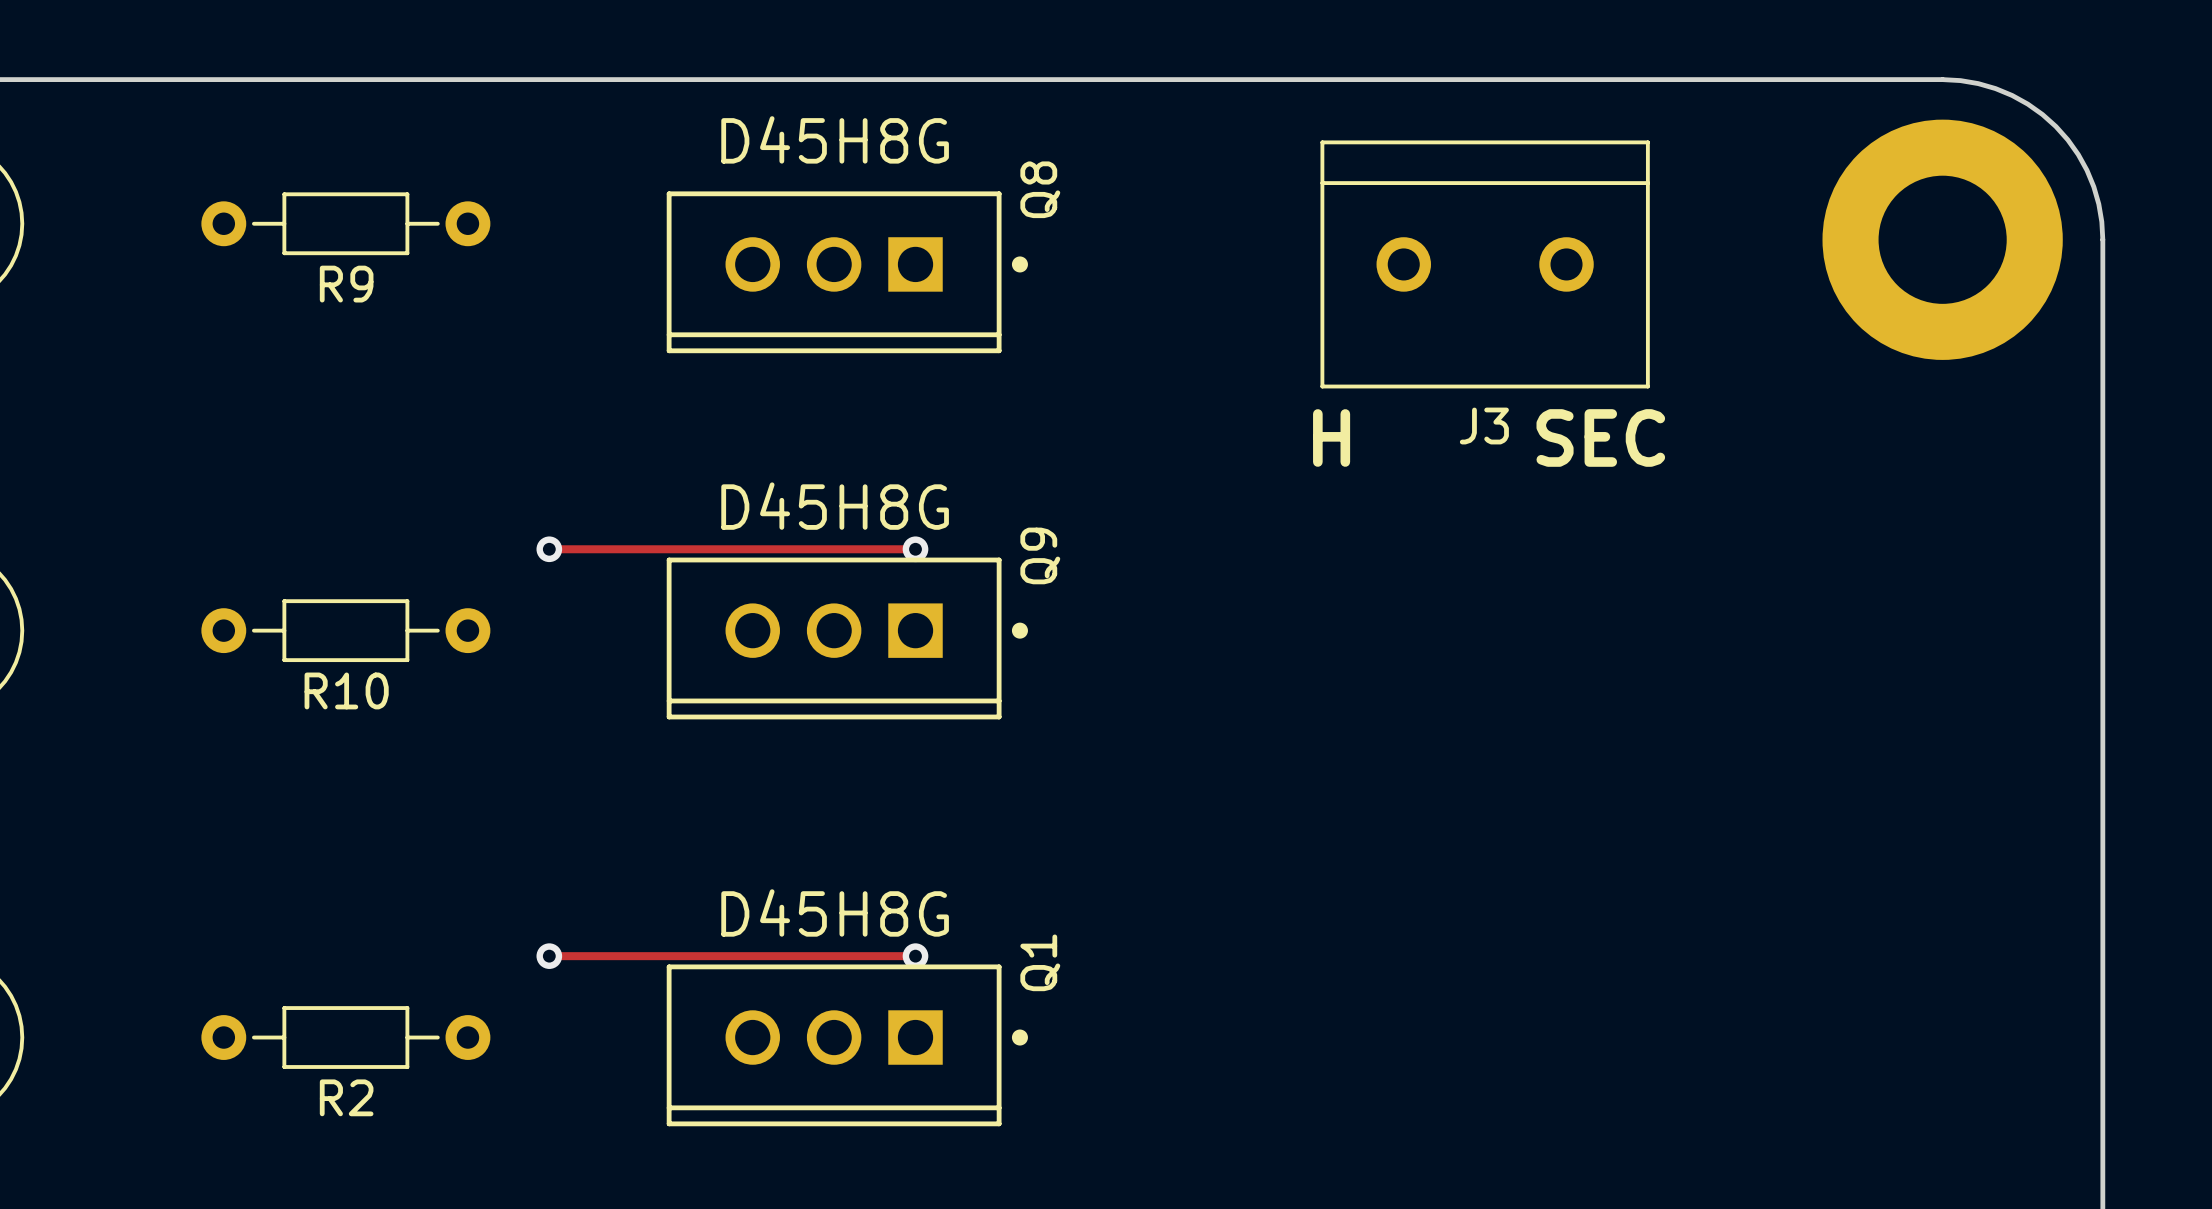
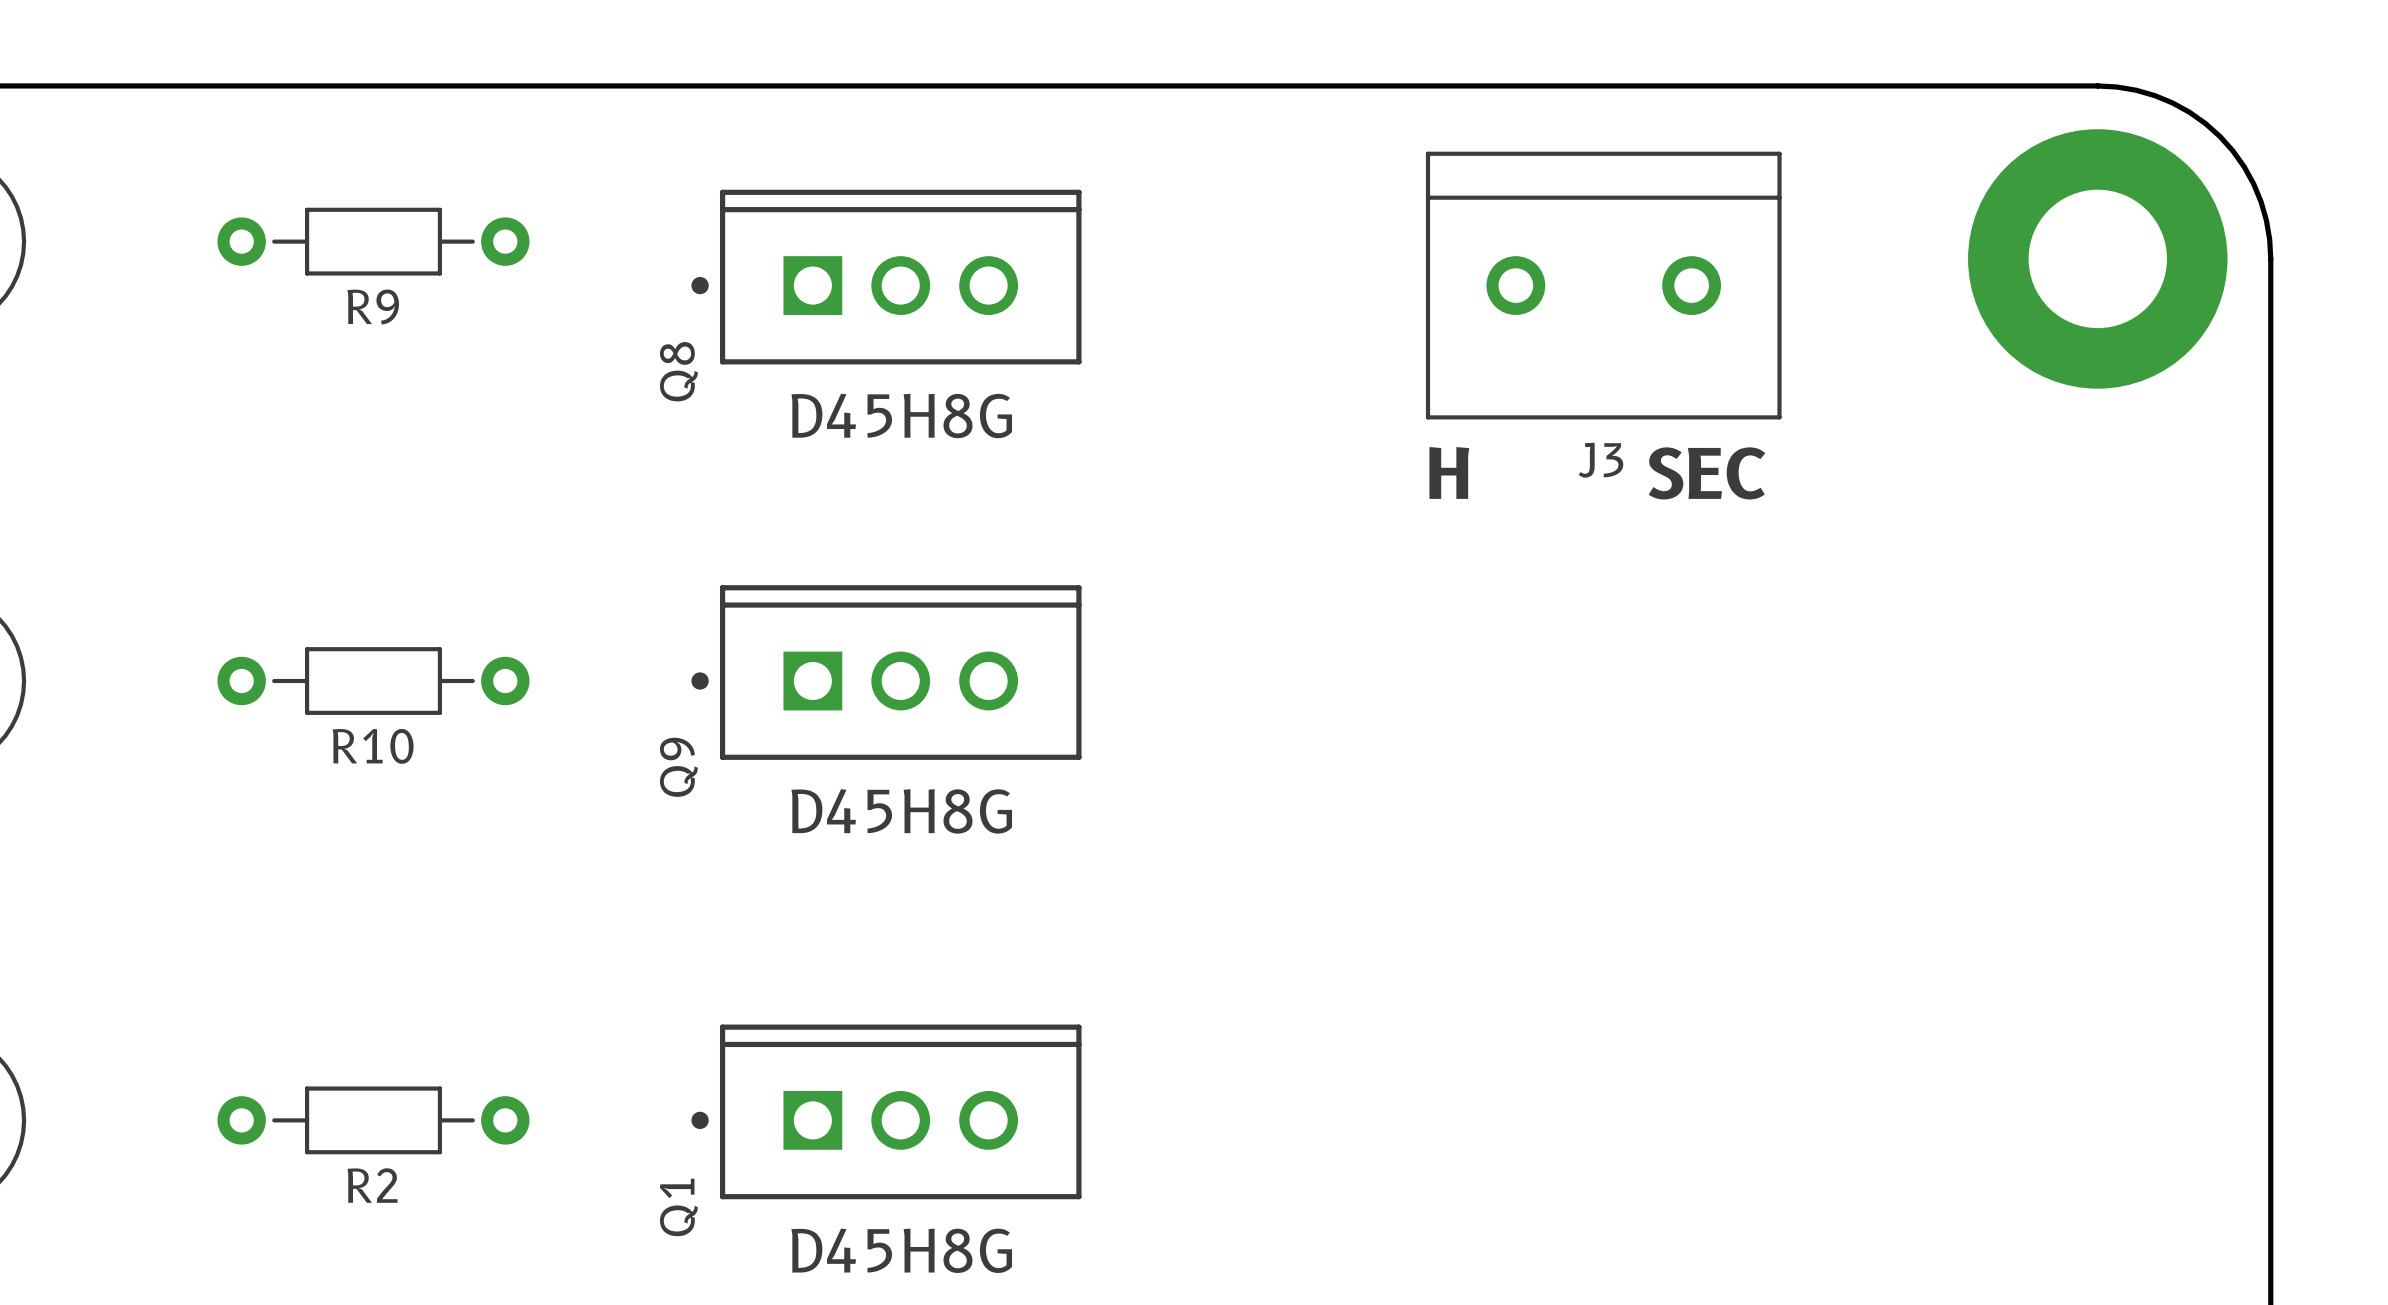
Q8 rotation: 0° (847, 272) -> 180° (886, 277)
track: (549, 549) (915, 549) -> none
via: (549, 549) -> none
via: (915, 549) -> none
Q9 rotation: 0° (847, 638) -> 180° (886, 672)
track: (549, 956) (915, 956) -> none
via: (549, 956) -> none
via: (915, 956) -> none
Q1 rotation: 0° (847, 1045) -> 180° (886, 1111)

